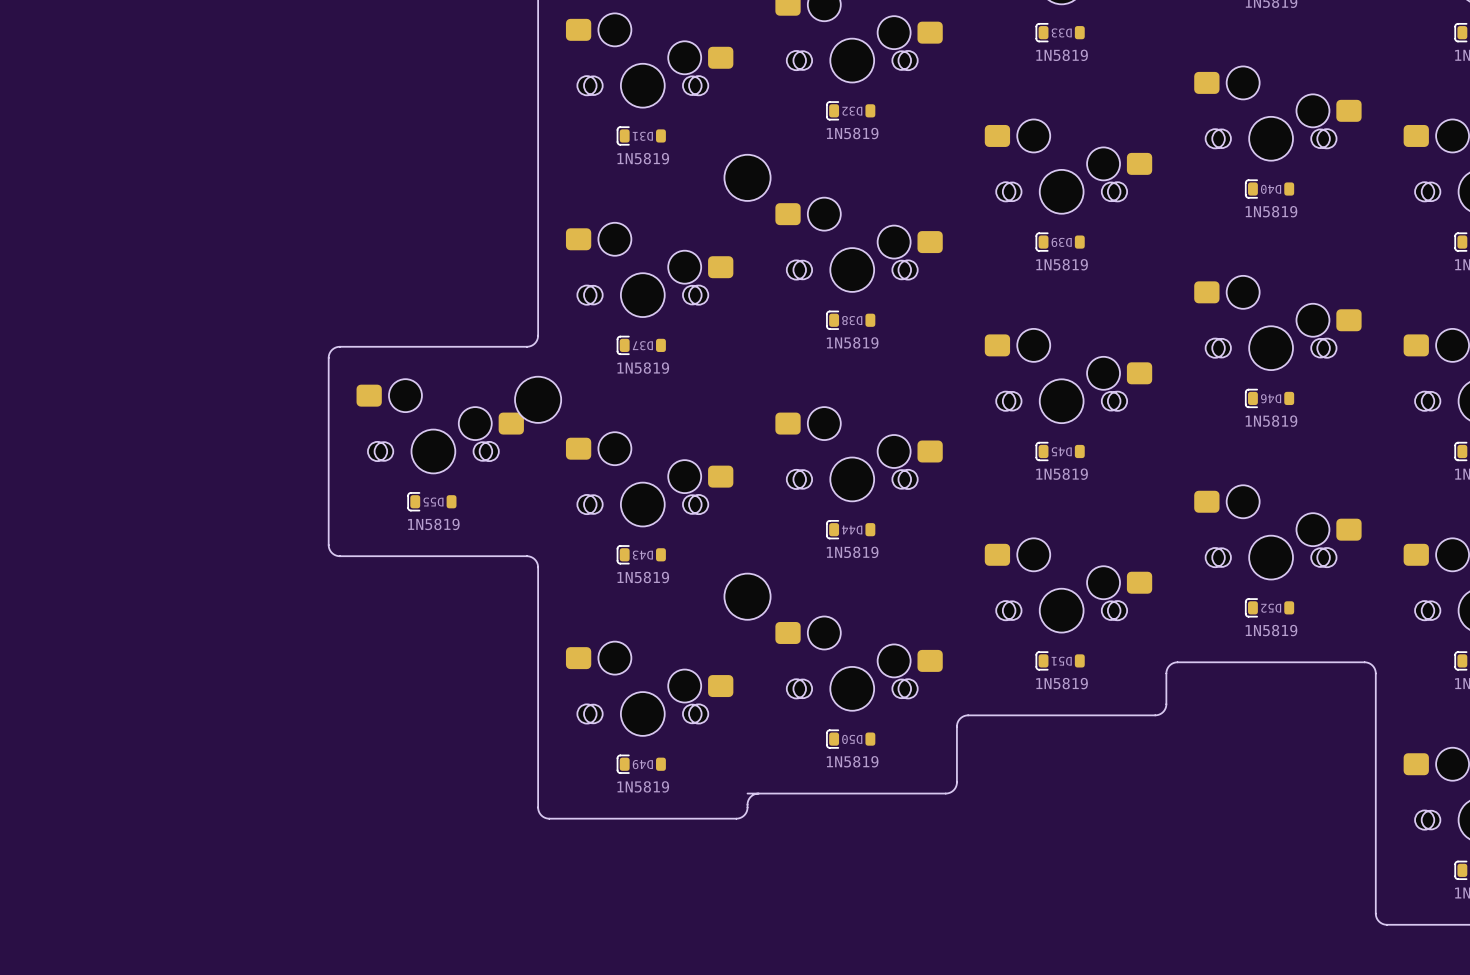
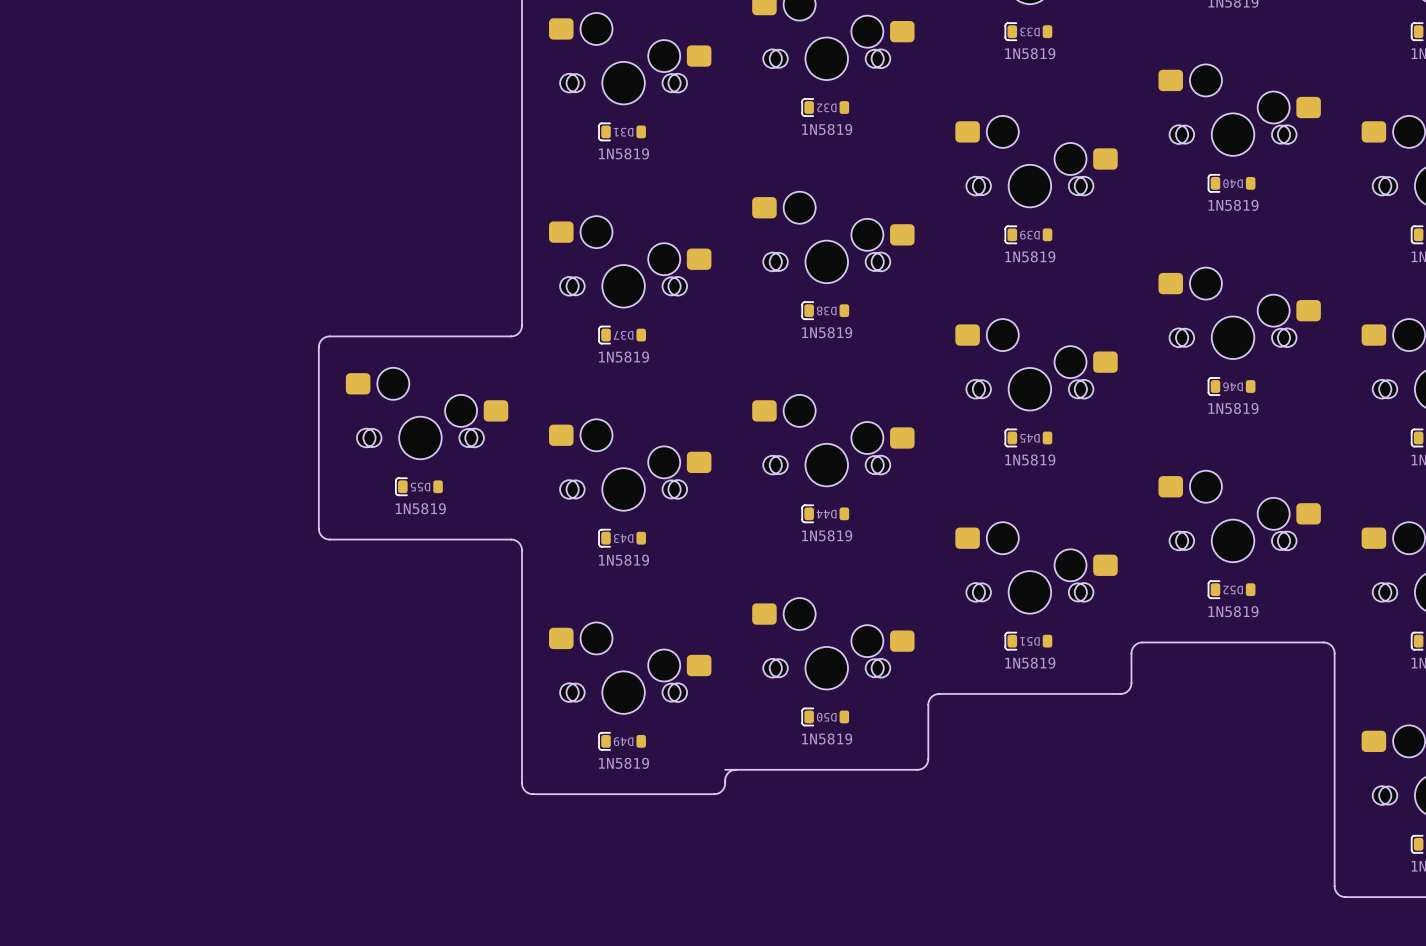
part: (747, 177) -> none
part: (538, 399) -> none
part: (747, 596) -> none

